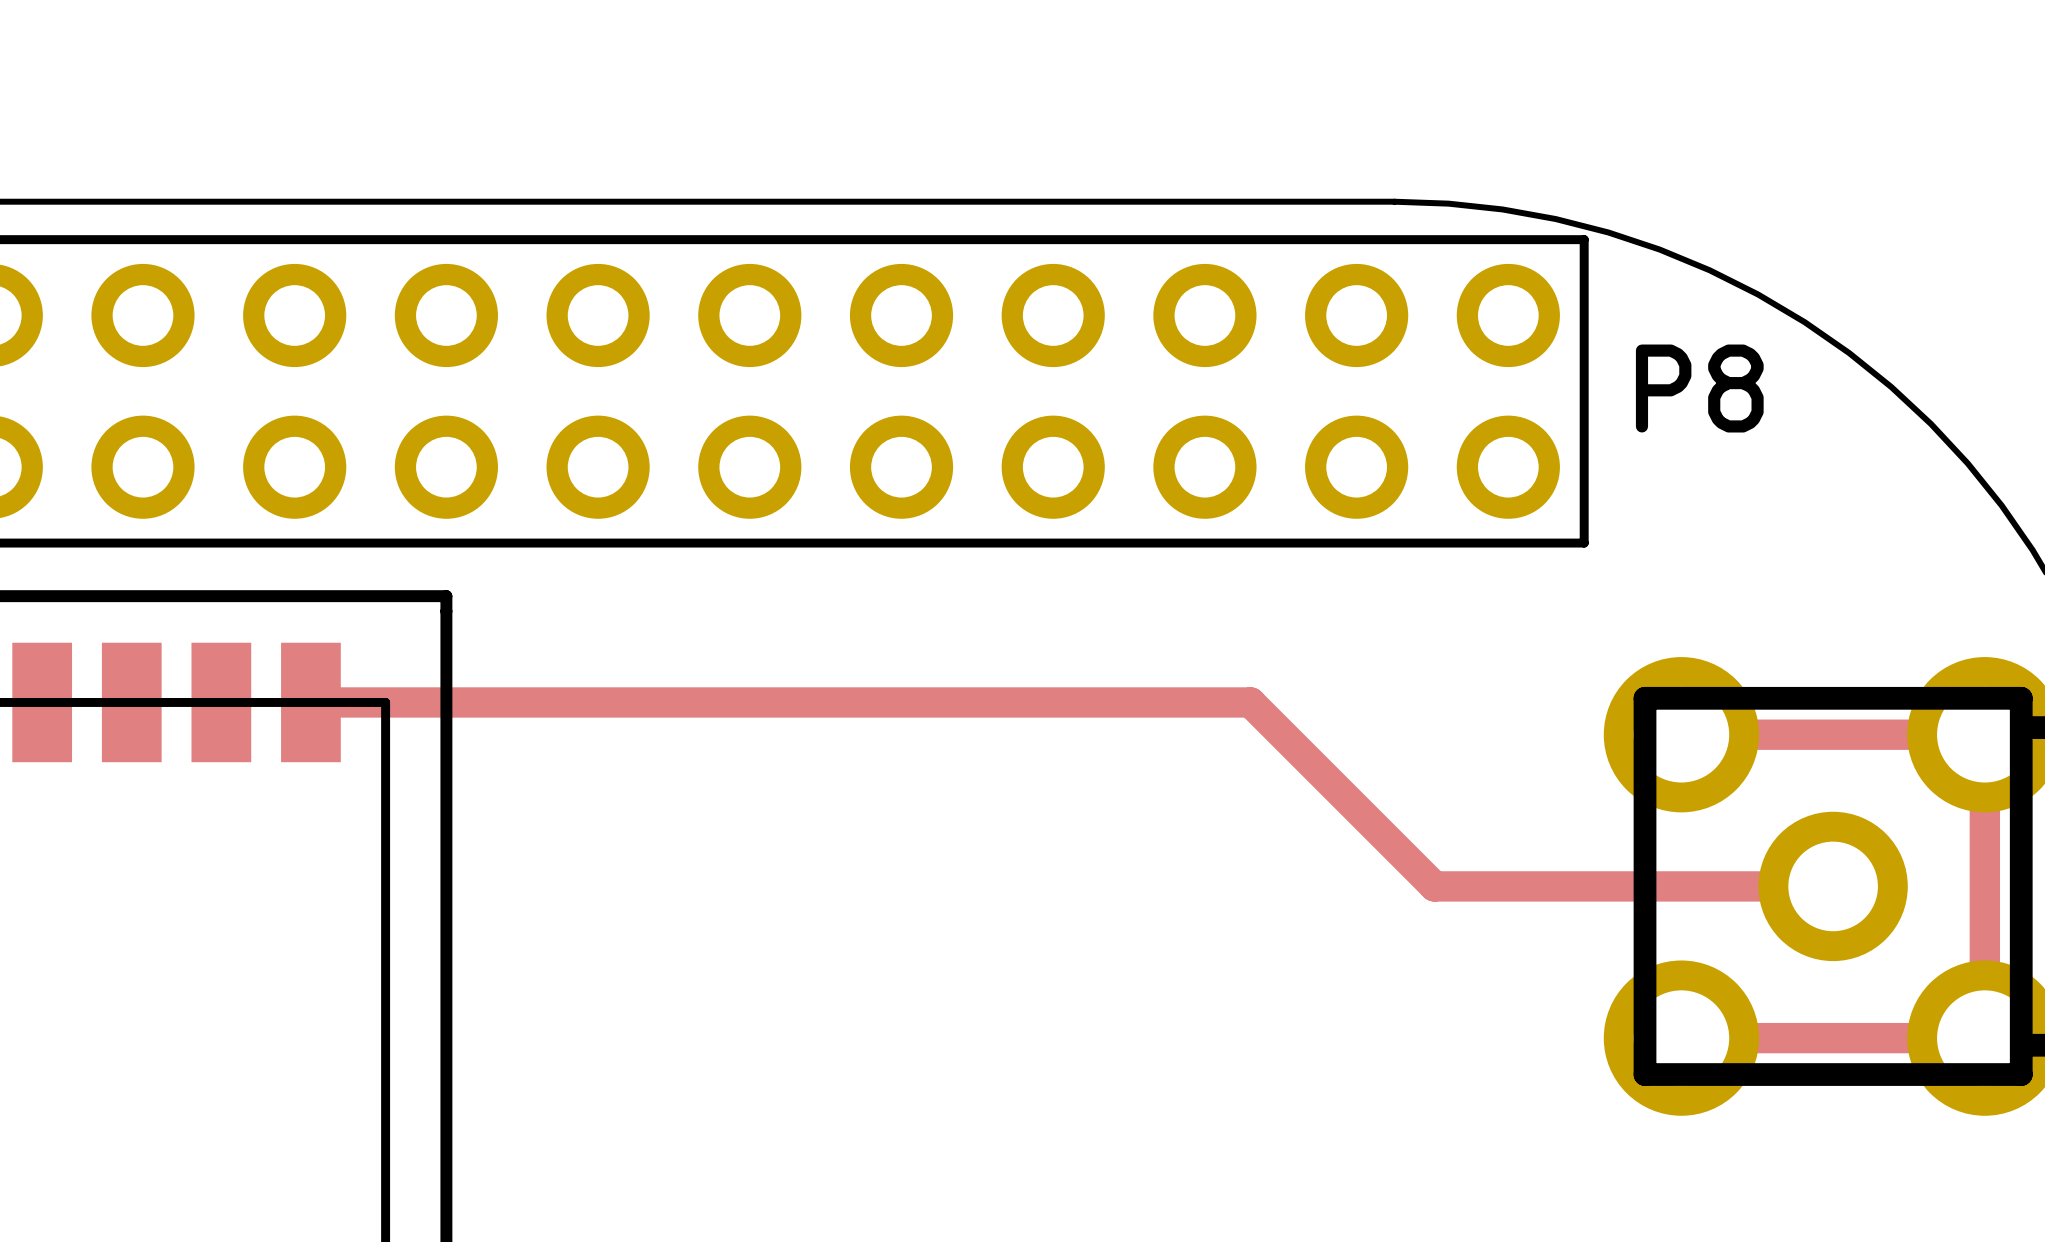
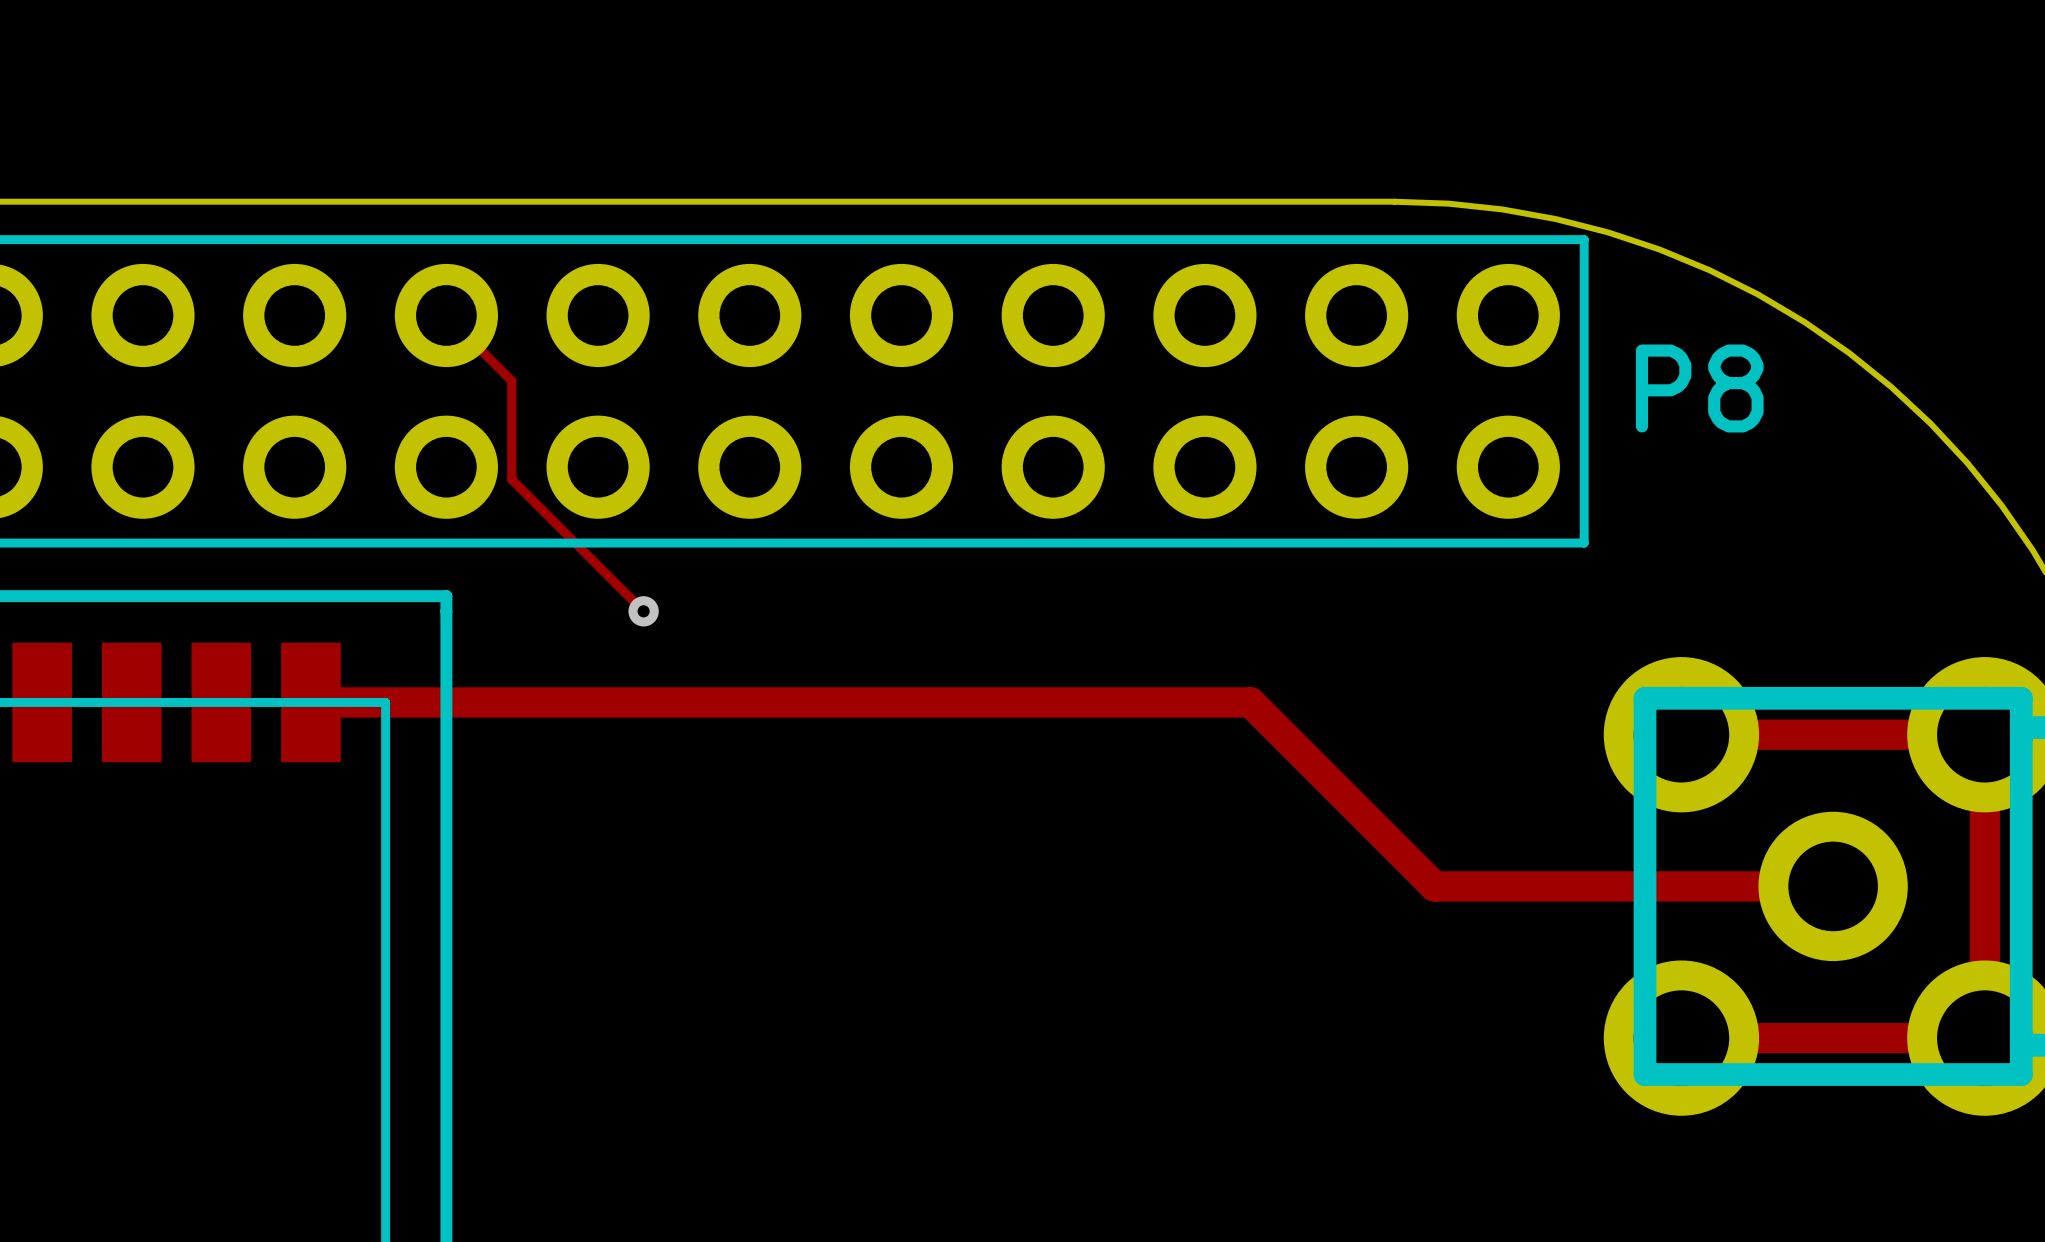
track: none -> (446, 315) (511, 380) (511, 479) (643, 611)
via: none -> (643, 611)

